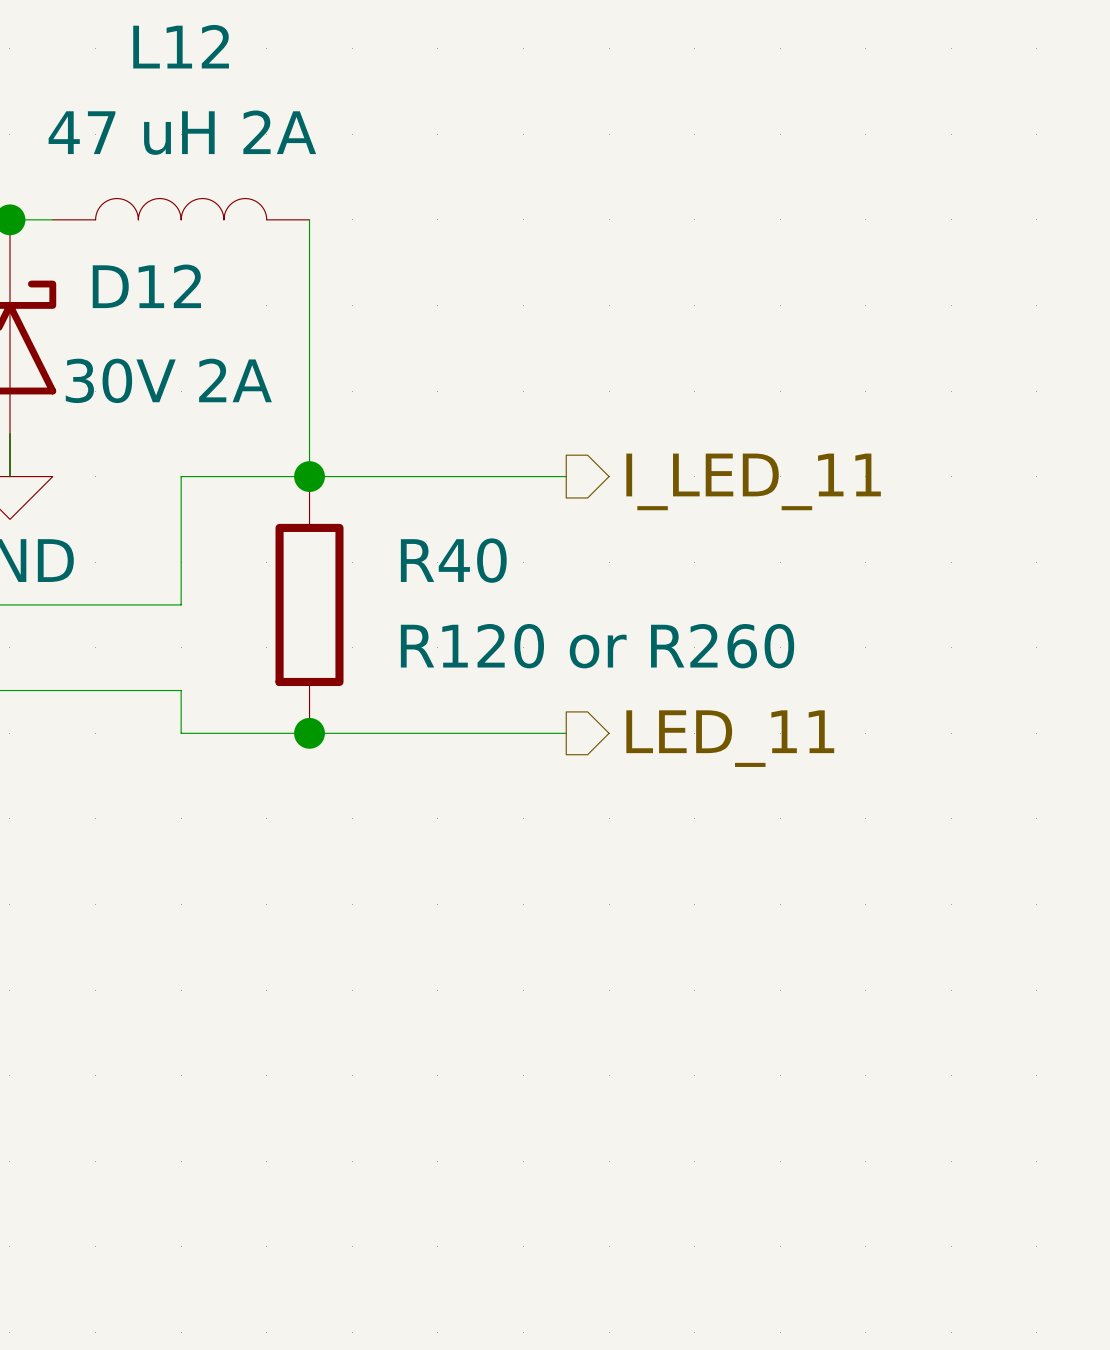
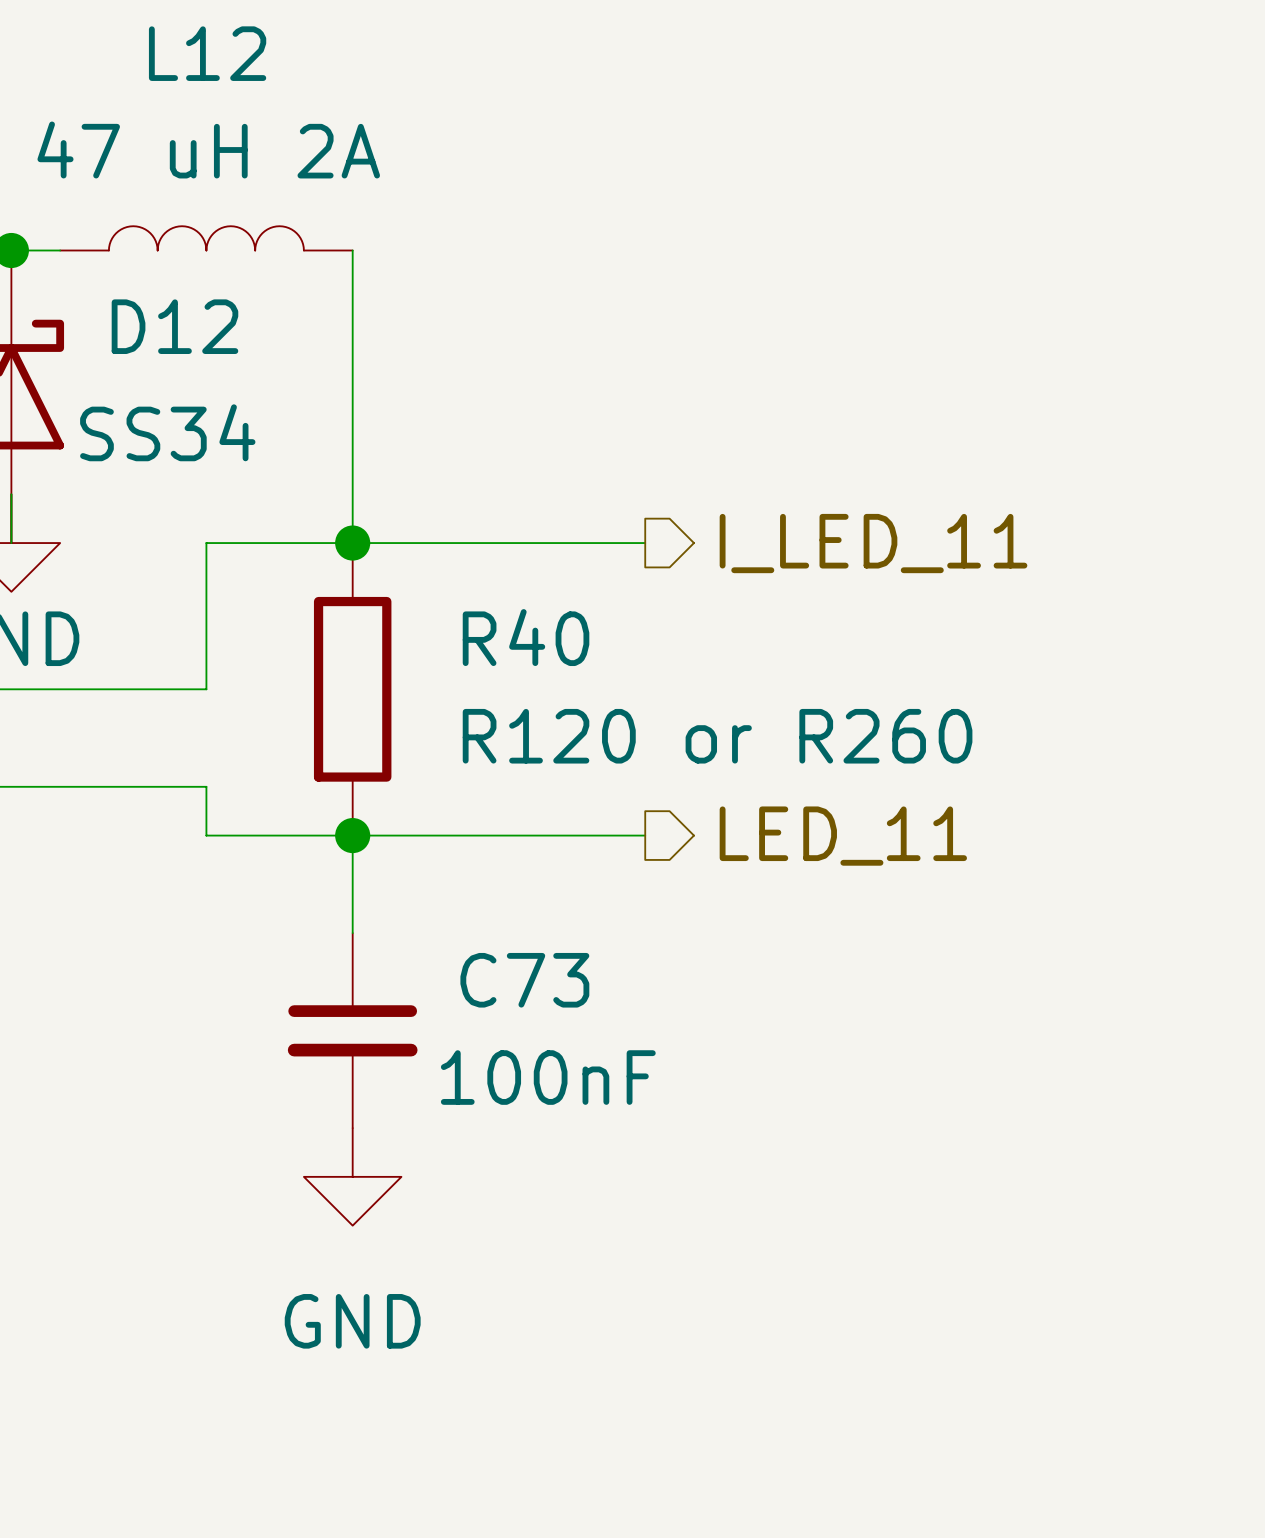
D12 value: 30V 2A (168, 380) -> SS34 (167, 432)
wire: none -> (352, 835) (352, 933)
C73: none -> 100nF (352, 1030)
power symbol: none -> GND (352, 1176)

